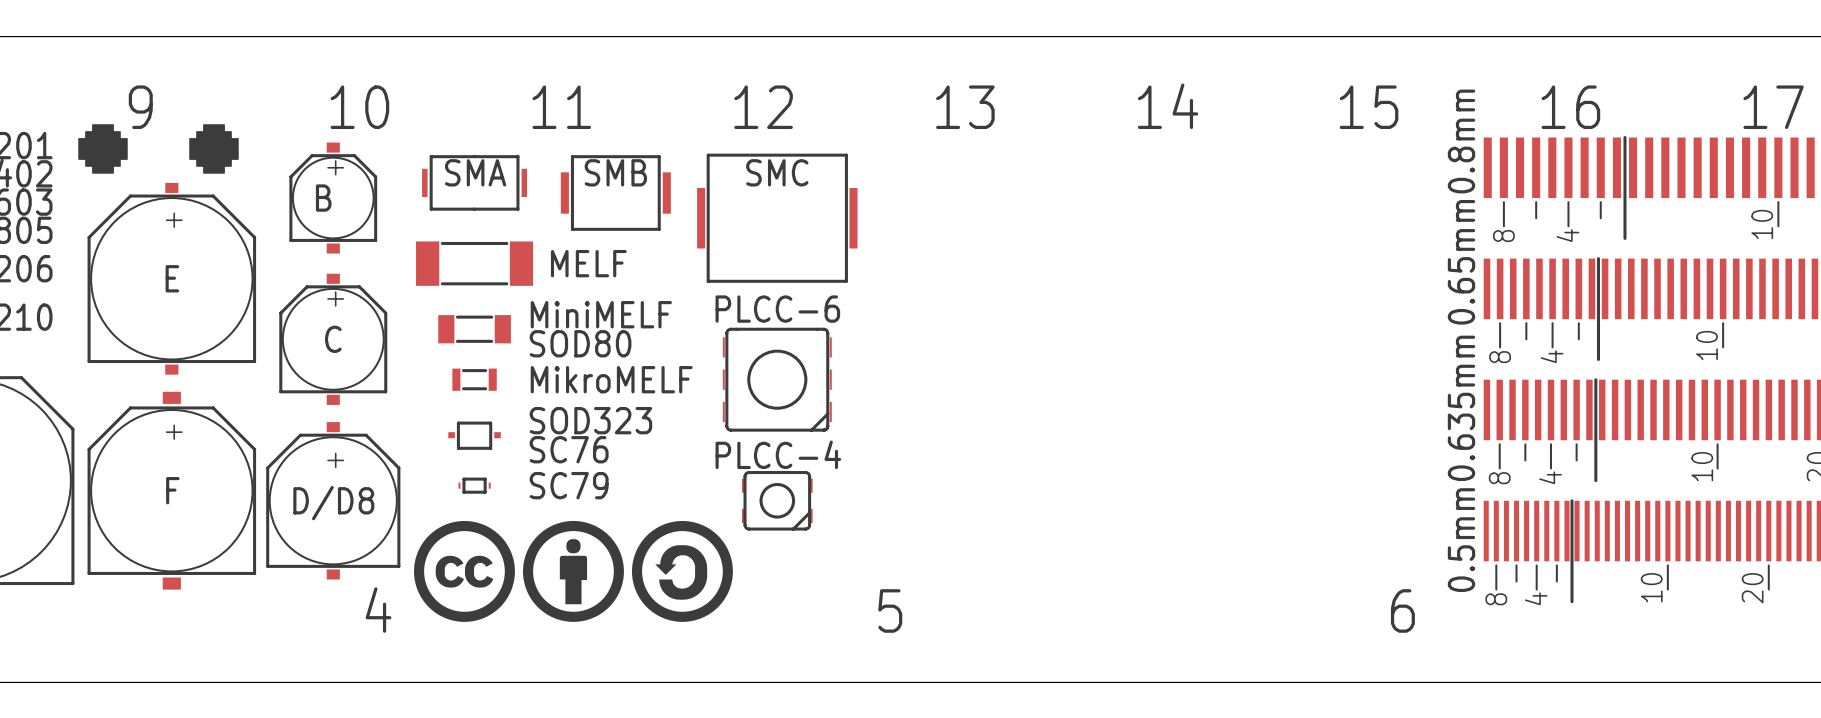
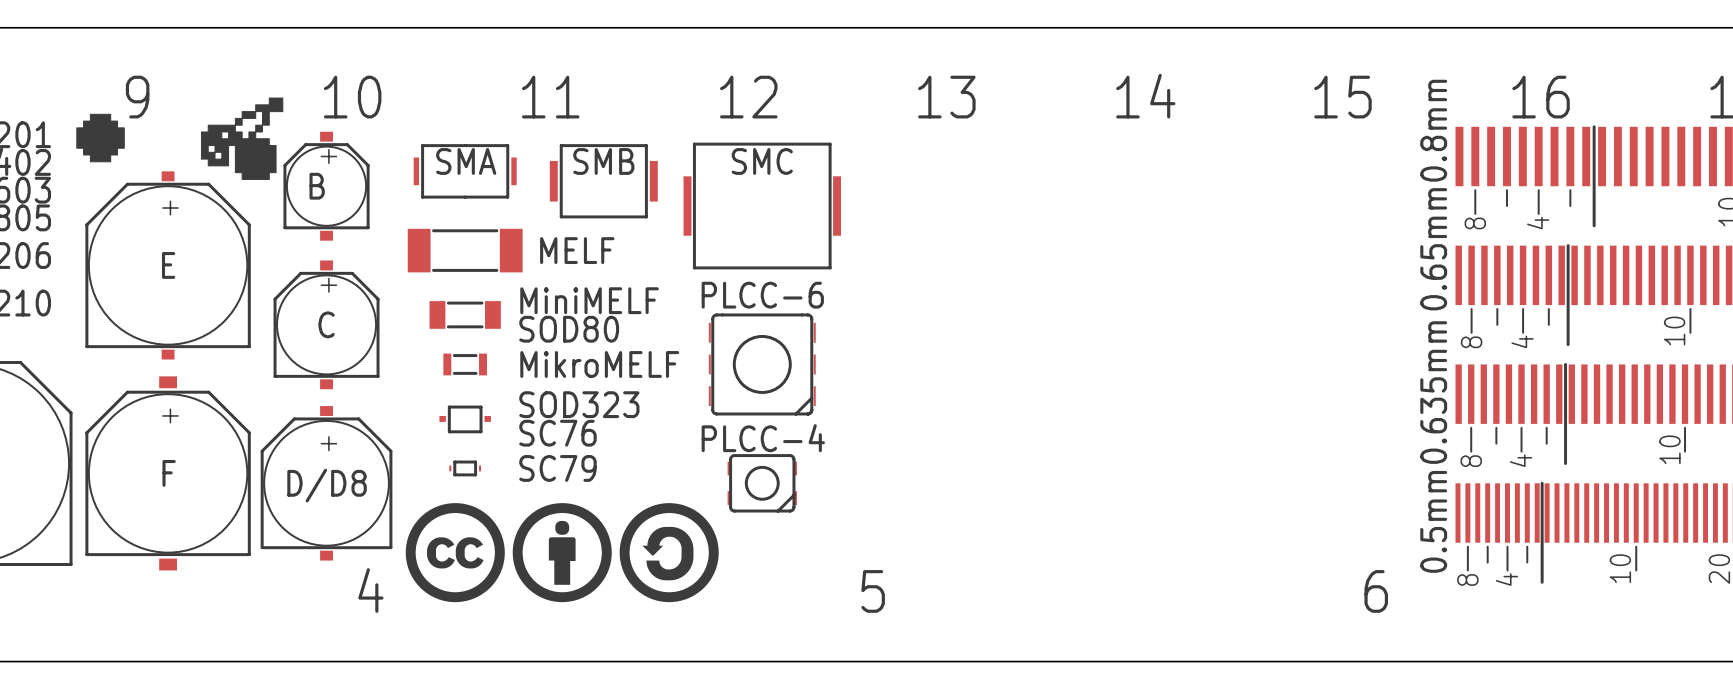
drawing: none -> [200, 97, 284, 180]
drawing: [189, 124, 239, 174] -> none

